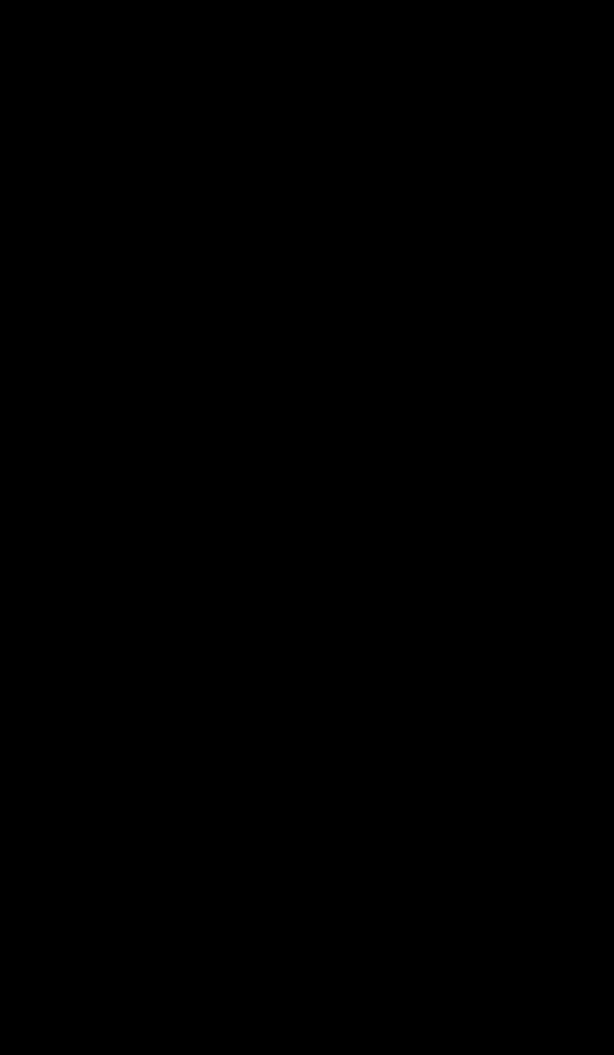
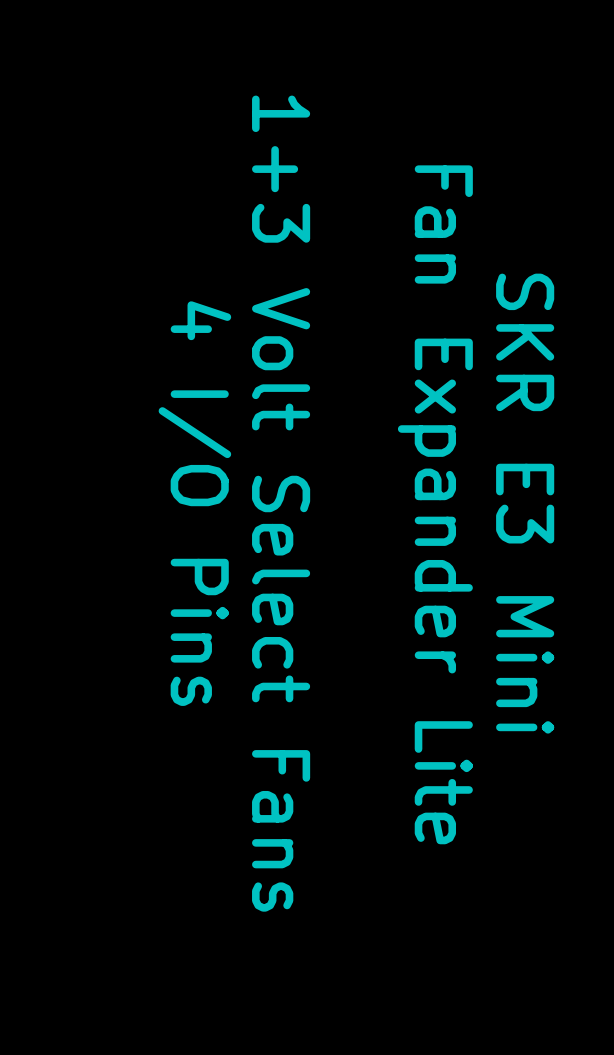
text: none -> 4 I/O Pins (194, 503)
text: none -> 1+3 Volt Select Fans (281, 503)
text: none -> SKR E3 Mini (525, 503)
text: none -> Fan Expander Lite (435, 504)

